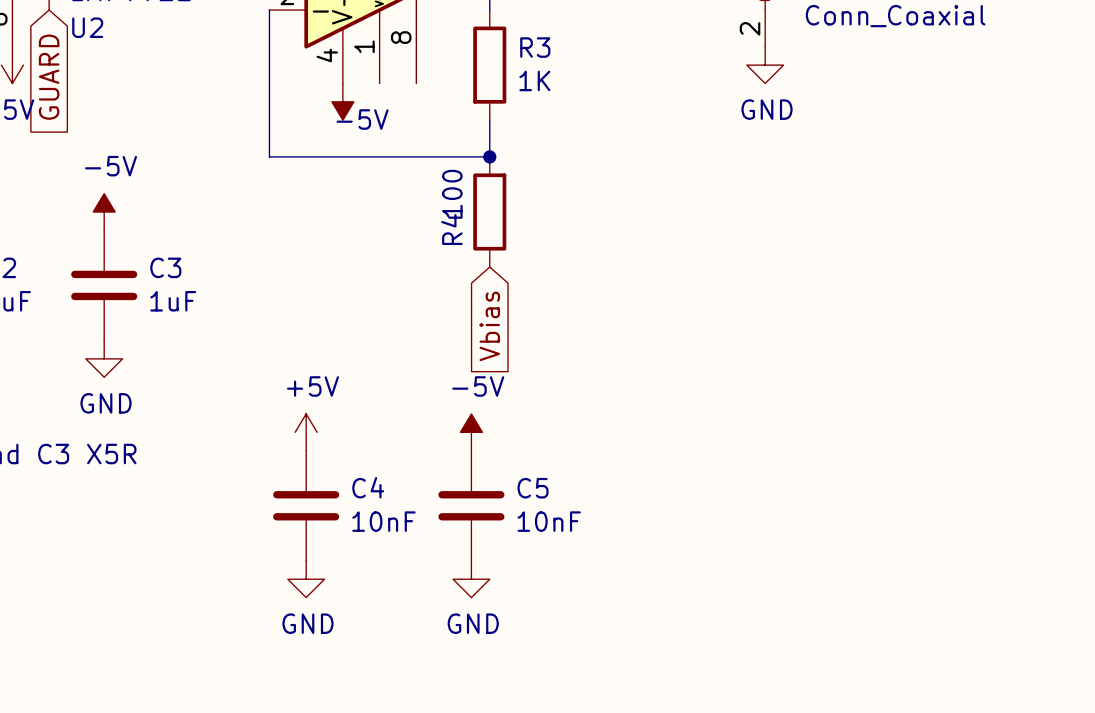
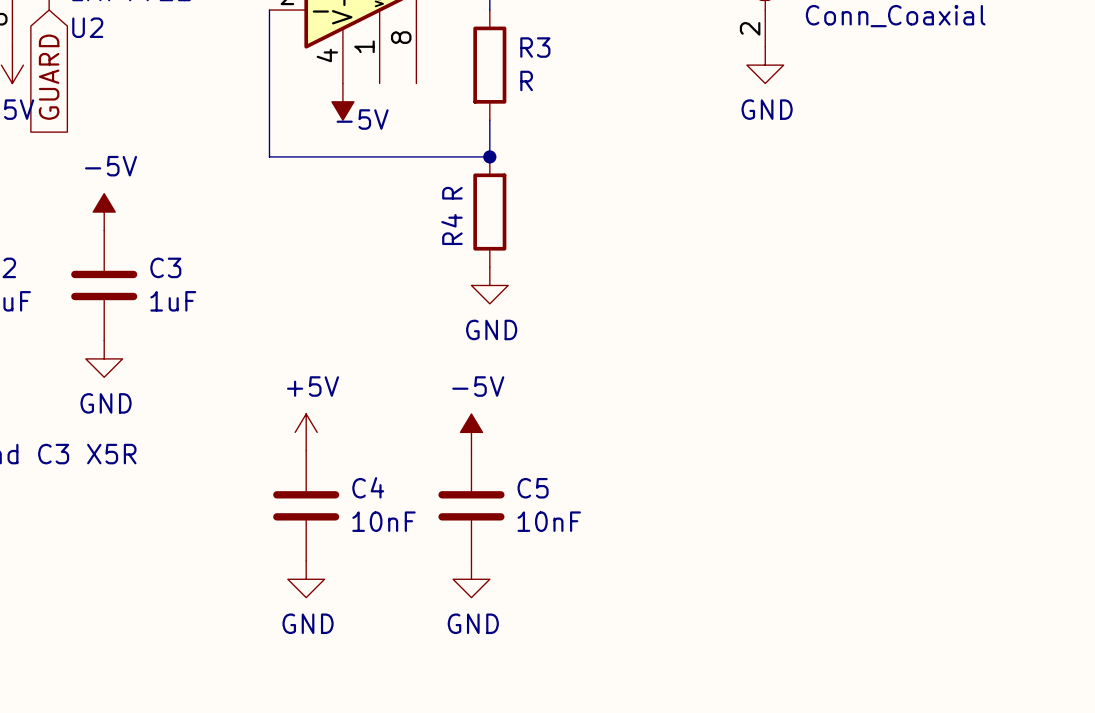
R3 value: 1K (534, 80) -> R (526, 80)
R4 value: 100 (452, 193) -> R (452, 193)
power symbol: none -> GND (489, 285)
global label: Vbias (489, 326) -> none

